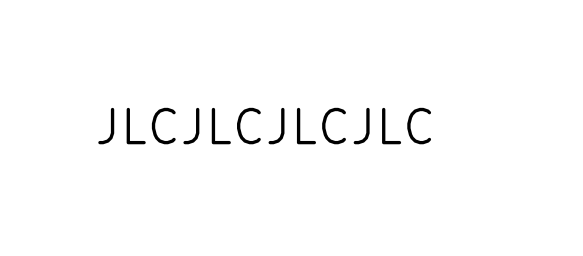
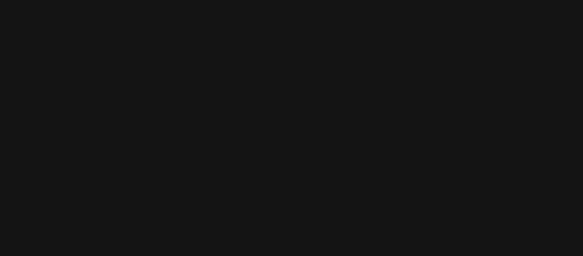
text: JLCJLCJLCJLC (264, 126) -> none

